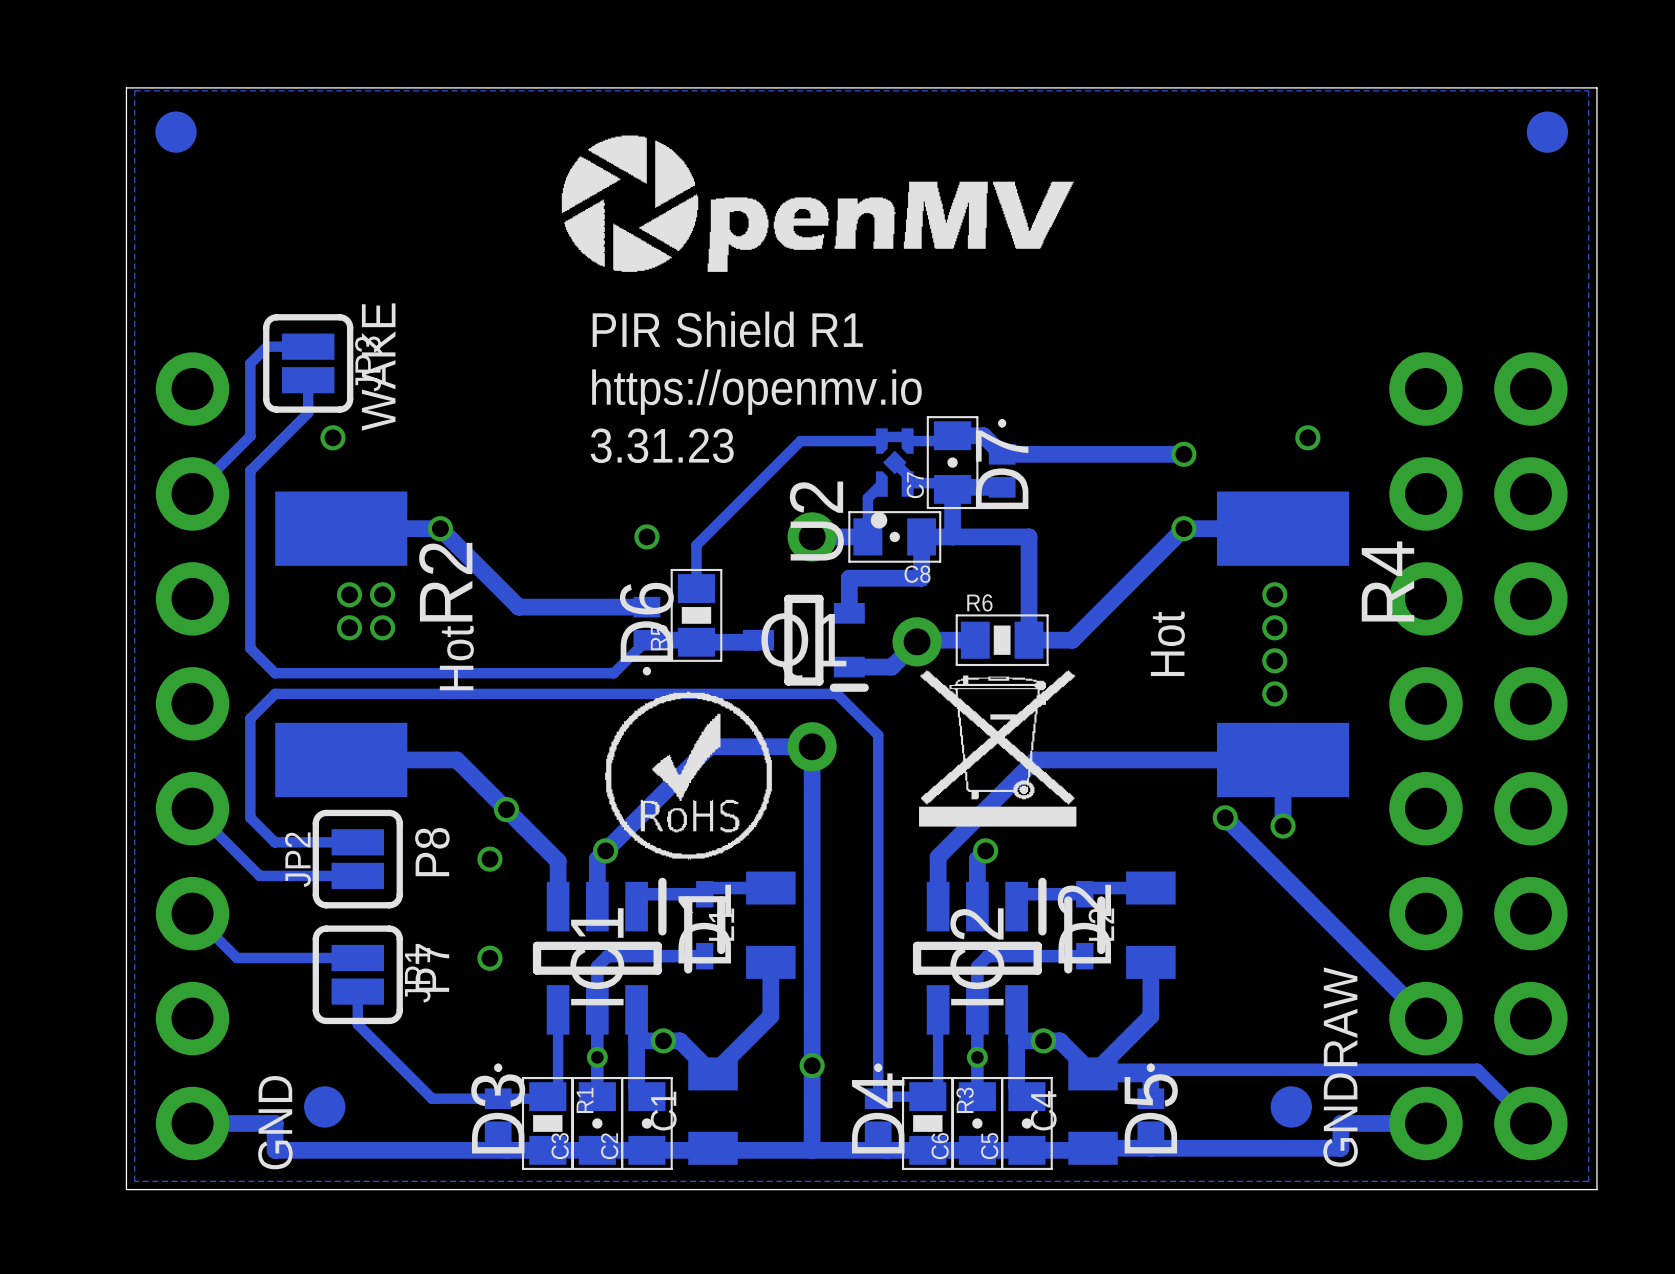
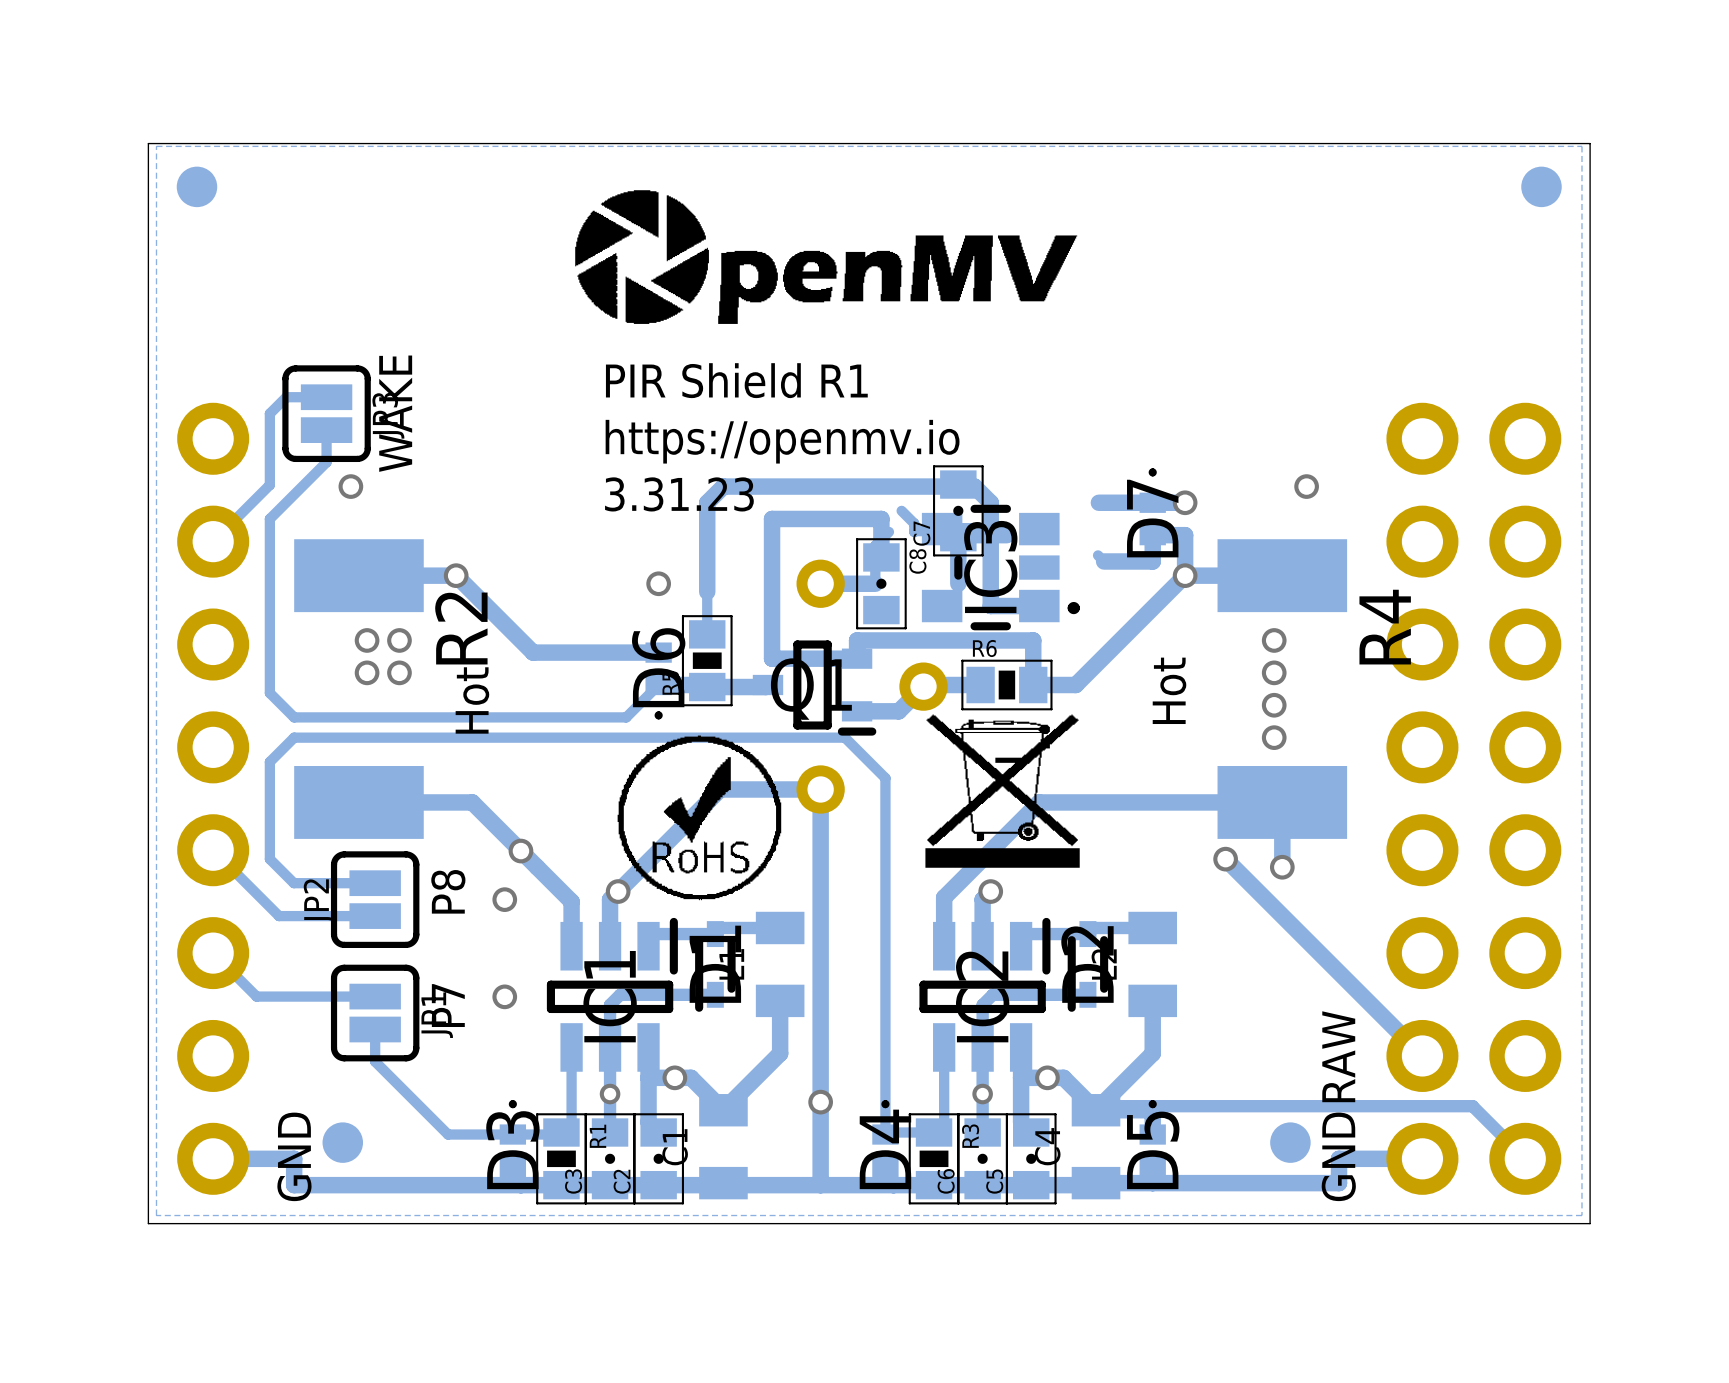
track: (1095, 454) (1002, 454) (983, 435) (952, 435) (947, 441) (907, 441) (907, 436) (885, 436) (881, 441) (800, 441) (696, 545) -> (1039, 606) (990, 606) (990, 502) (974, 486) (723, 486) (707, 502) (707, 591)
D7 position: (1002, 458) -> (1152, 506)
U2: (892, 478) -> none
track: none -> (1098, 555) (1104, 561) (1152, 561) (1152, 535) (1185, 535) (1185, 575)
track: none -> (881, 557) (881, 518) (772, 518) (772, 658) (857, 658)
IC3: none -> (1000, 567)
C8 rotation: 0° (894, 536) -> 90° clockwise (881, 583)
track: (1029, 594) (1029, 536) (921, 536) (921, 578) (849, 578) (849, 594) -> (1033, 640) (857, 640)

